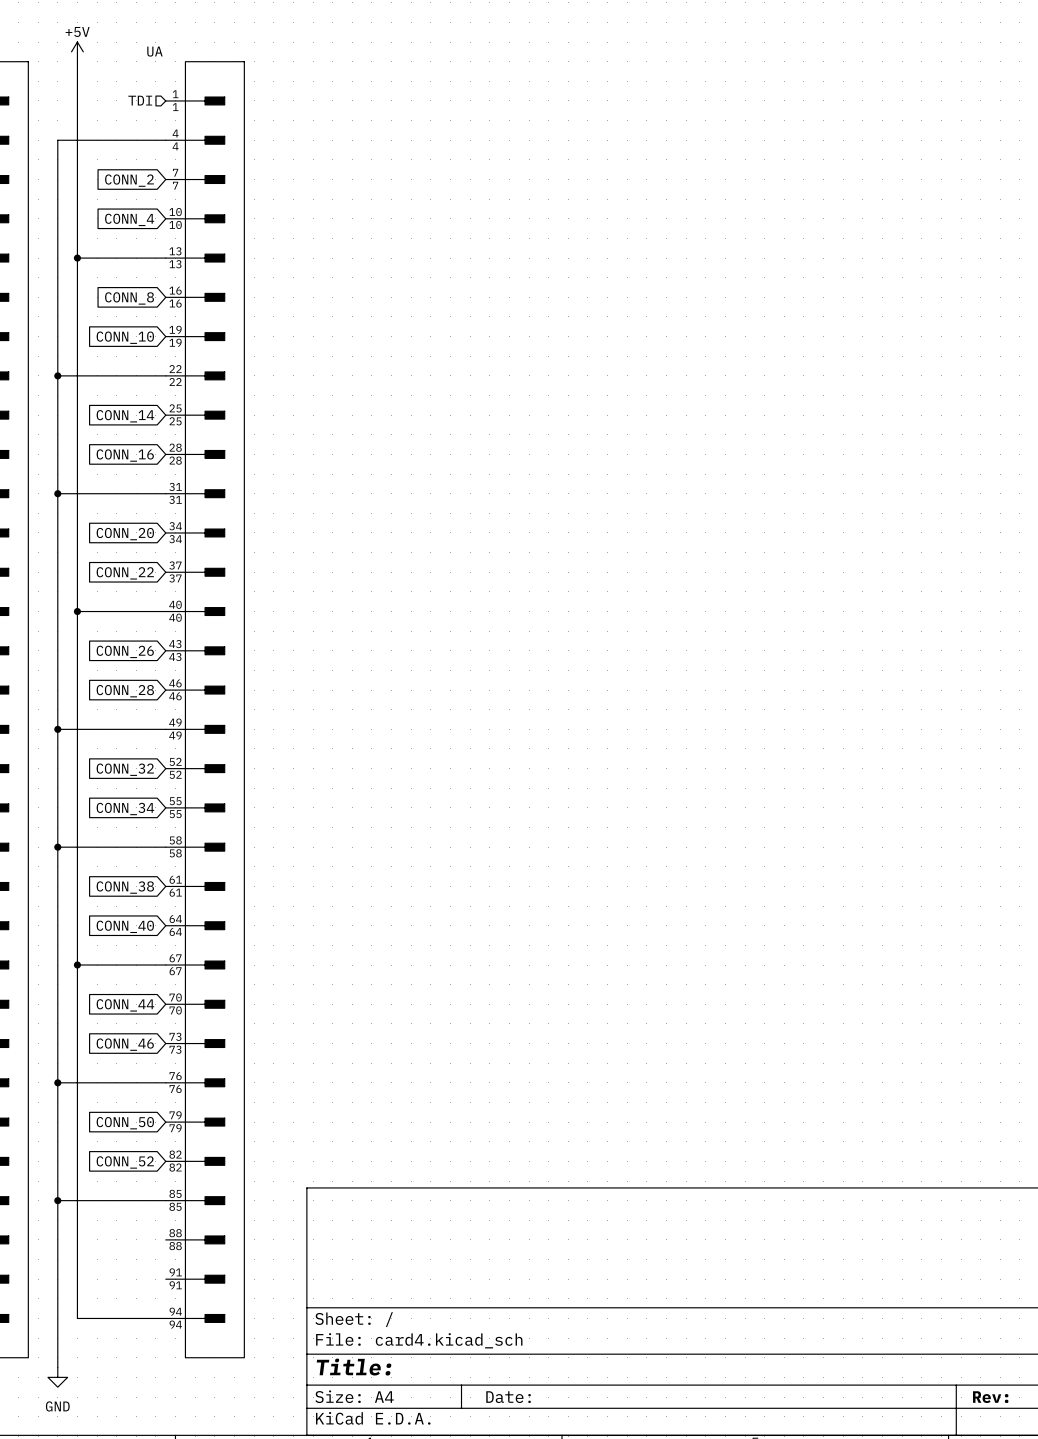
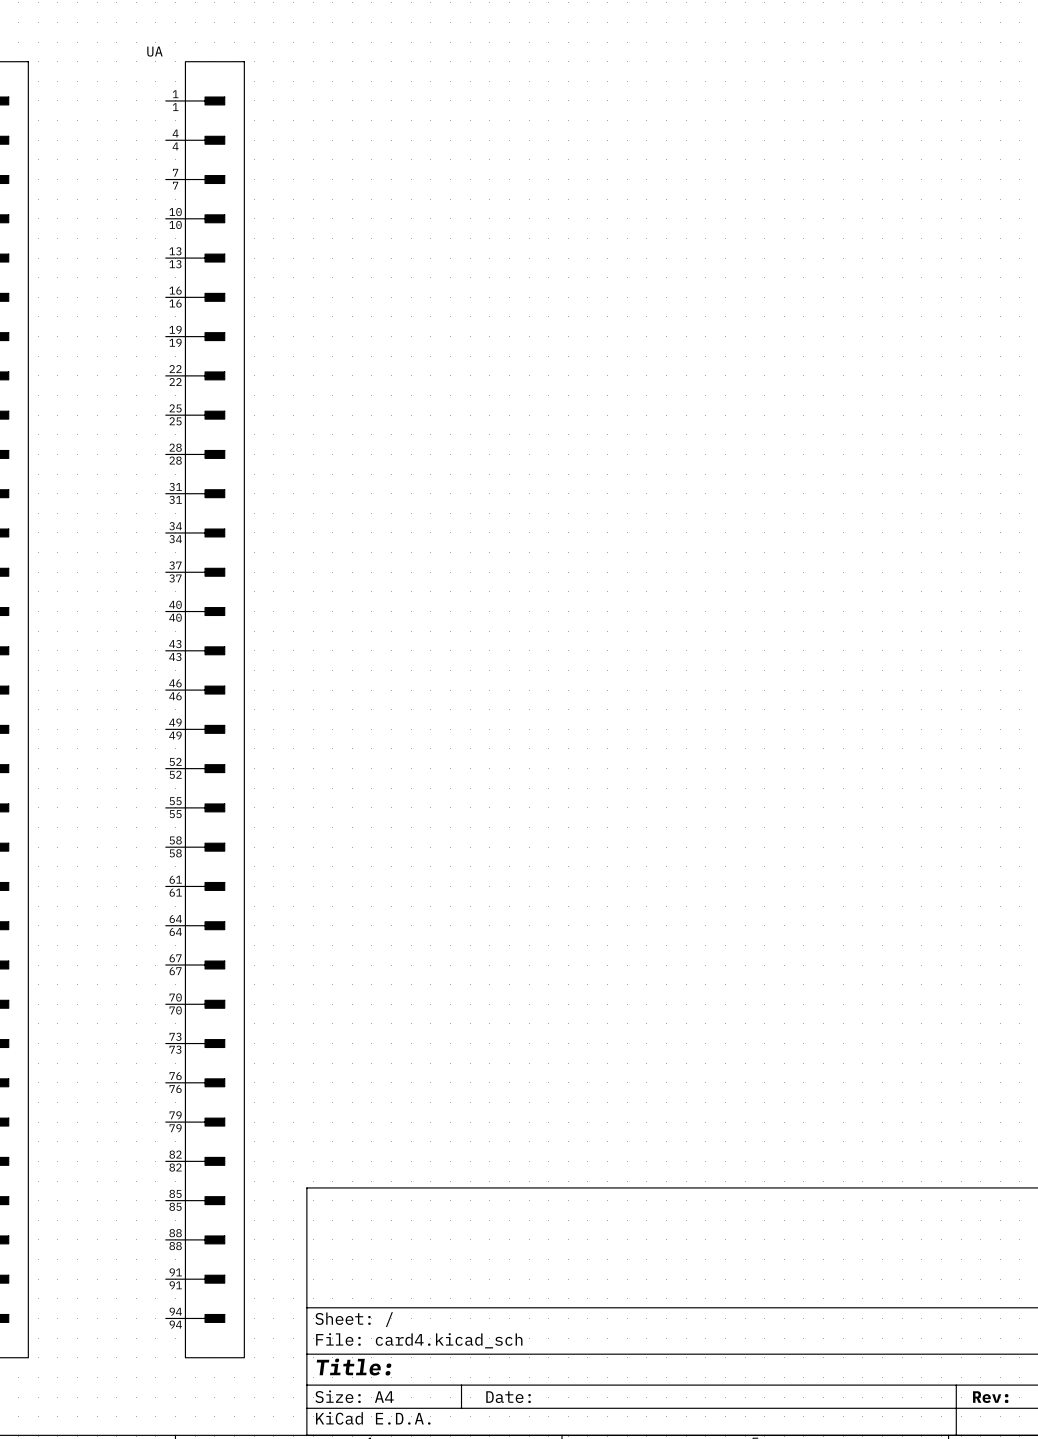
power symbol: +5V (77, 51) -> none
wire: (77, 61) (77, 1318) (165, 1318) -> none
hierarchical label: TDI (140, 100) -> none
wire: (165, 140) (57, 140) (57, 1367) -> none
global label: CONN_2 (129, 180) -> none
global label: CONN_4 (129, 219) -> none
wire: (77, 258) (165, 258) -> none
junction: (77, 258) -> none
global label: CONN_8 (129, 298) -> none
global label: CONN_10 (125, 337) -> none
wire: (57, 375) (165, 375) -> none
junction: (57, 375) -> none
global label: CONN_14 (125, 416) -> none
global label: CONN_16 (125, 455) -> none
wire: (57, 493) (165, 493) -> none
junction: (57, 493) -> none
global label: CONN_20 (125, 534) -> none
global label: CONN_22 (125, 573) -> none
wire: (77, 611) (165, 611) -> none
junction: (77, 611) -> none
global label: CONN_26 (125, 651) -> none
global label: CONN_28 (125, 691) -> none
wire: (57, 729) (165, 729) -> none
junction: (57, 729) -> none
global label: CONN_32 (125, 769) -> none
global label: CONN_34 (125, 809) -> none
wire: (57, 847) (165, 847) -> none
junction: (57, 847) -> none
global label: CONN_38 (125, 887) -> none
global label: CONN_40 (125, 926) -> none
wire: (77, 965) (165, 965) -> none
junction: (77, 965) -> none
global label: CONN_44 (125, 1005) -> none
global label: CONN_46 (125, 1044) -> none
wire: (57, 1082) (165, 1082) -> none
junction: (57, 1082) -> none
global label: CONN_50 (125, 1123) -> none
global label: CONN_52 (125, 1162) -> none
wire: (57, 1200) (165, 1200) -> none
junction: (57, 1200) -> none
power symbol: GND (57, 1377) -> none

